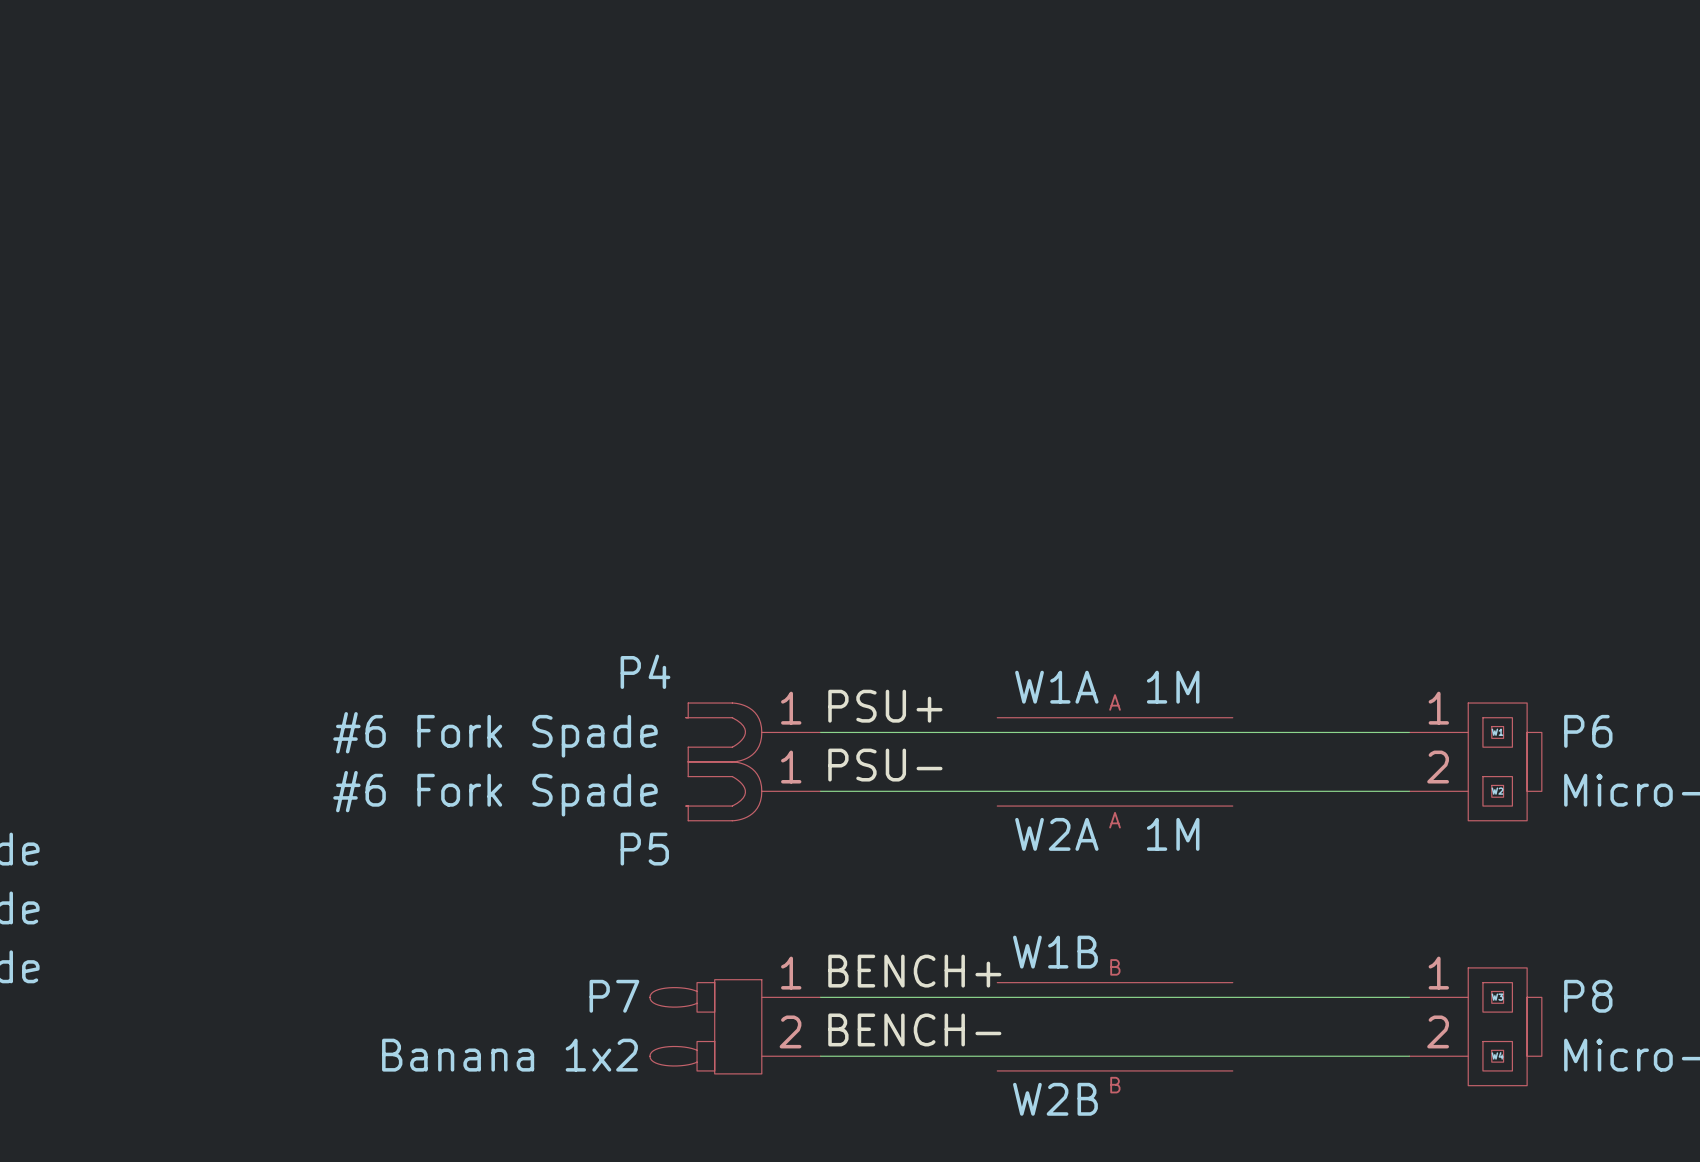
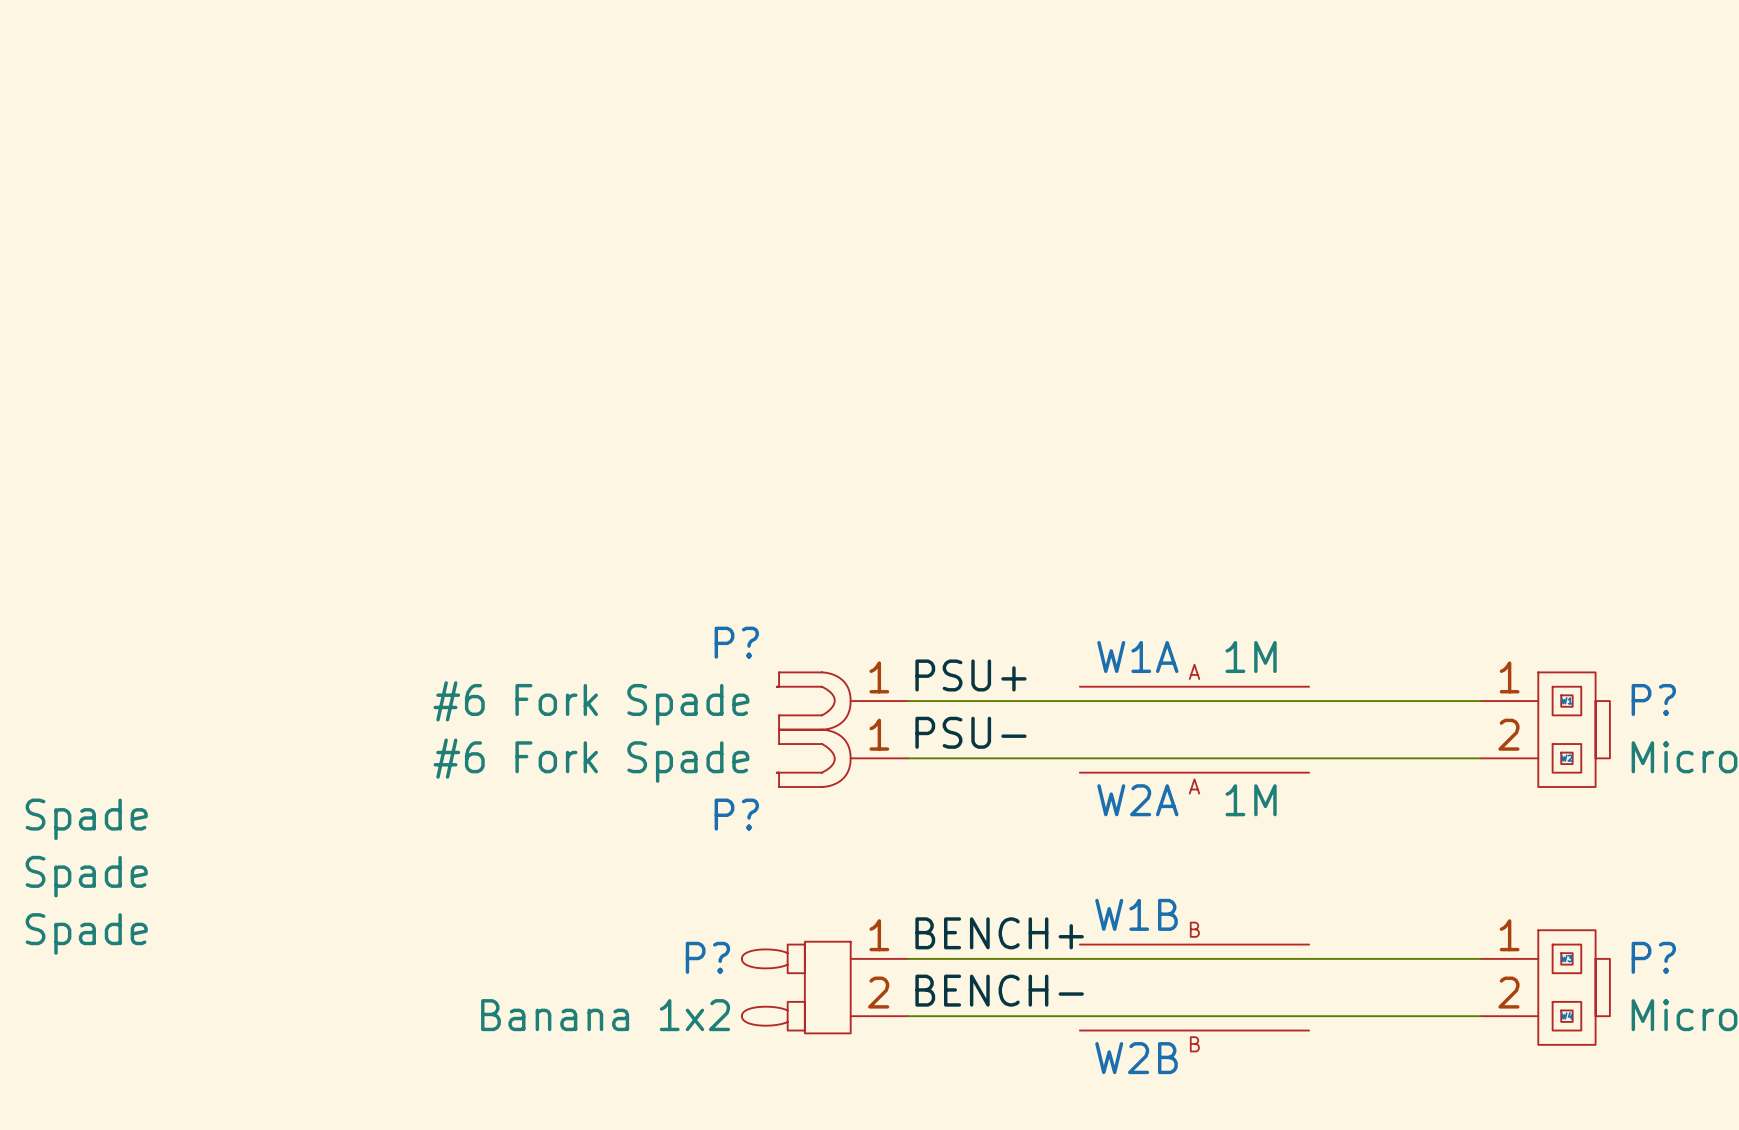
P4 name: P4 (645, 671) -> P? (736, 642)
P6 name: P6 (1588, 731) -> P? (1653, 699)
P5 name: P5 (644, 849) -> P? (736, 814)
P7 name: P7 (614, 996) -> P? (707, 957)
P8 name: P8 (1588, 996) -> P? (1653, 957)

